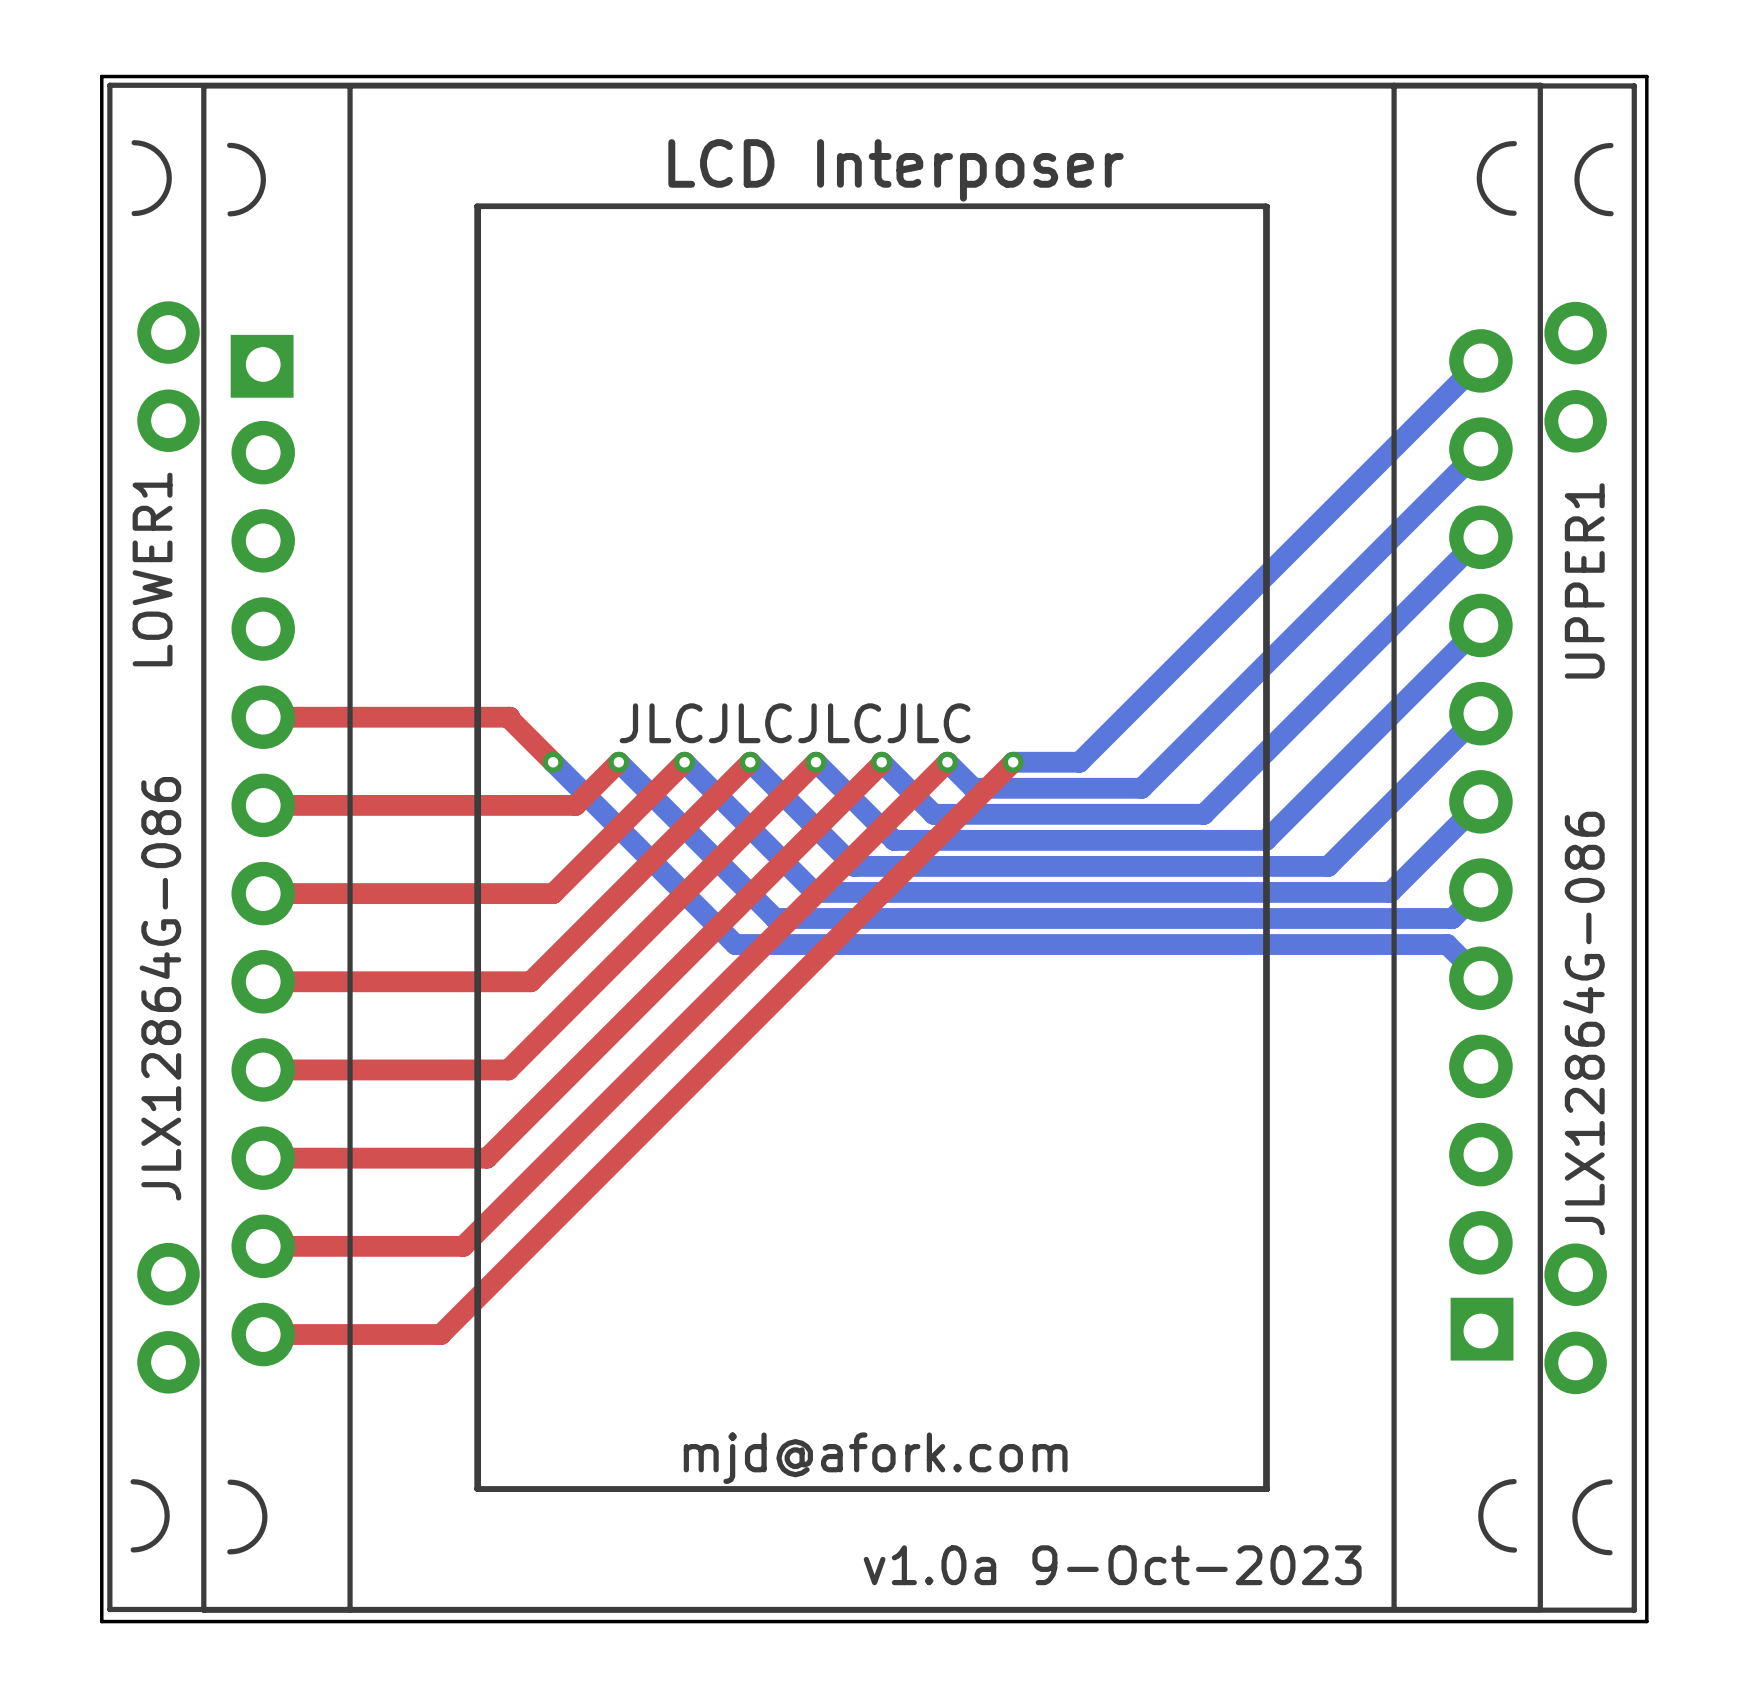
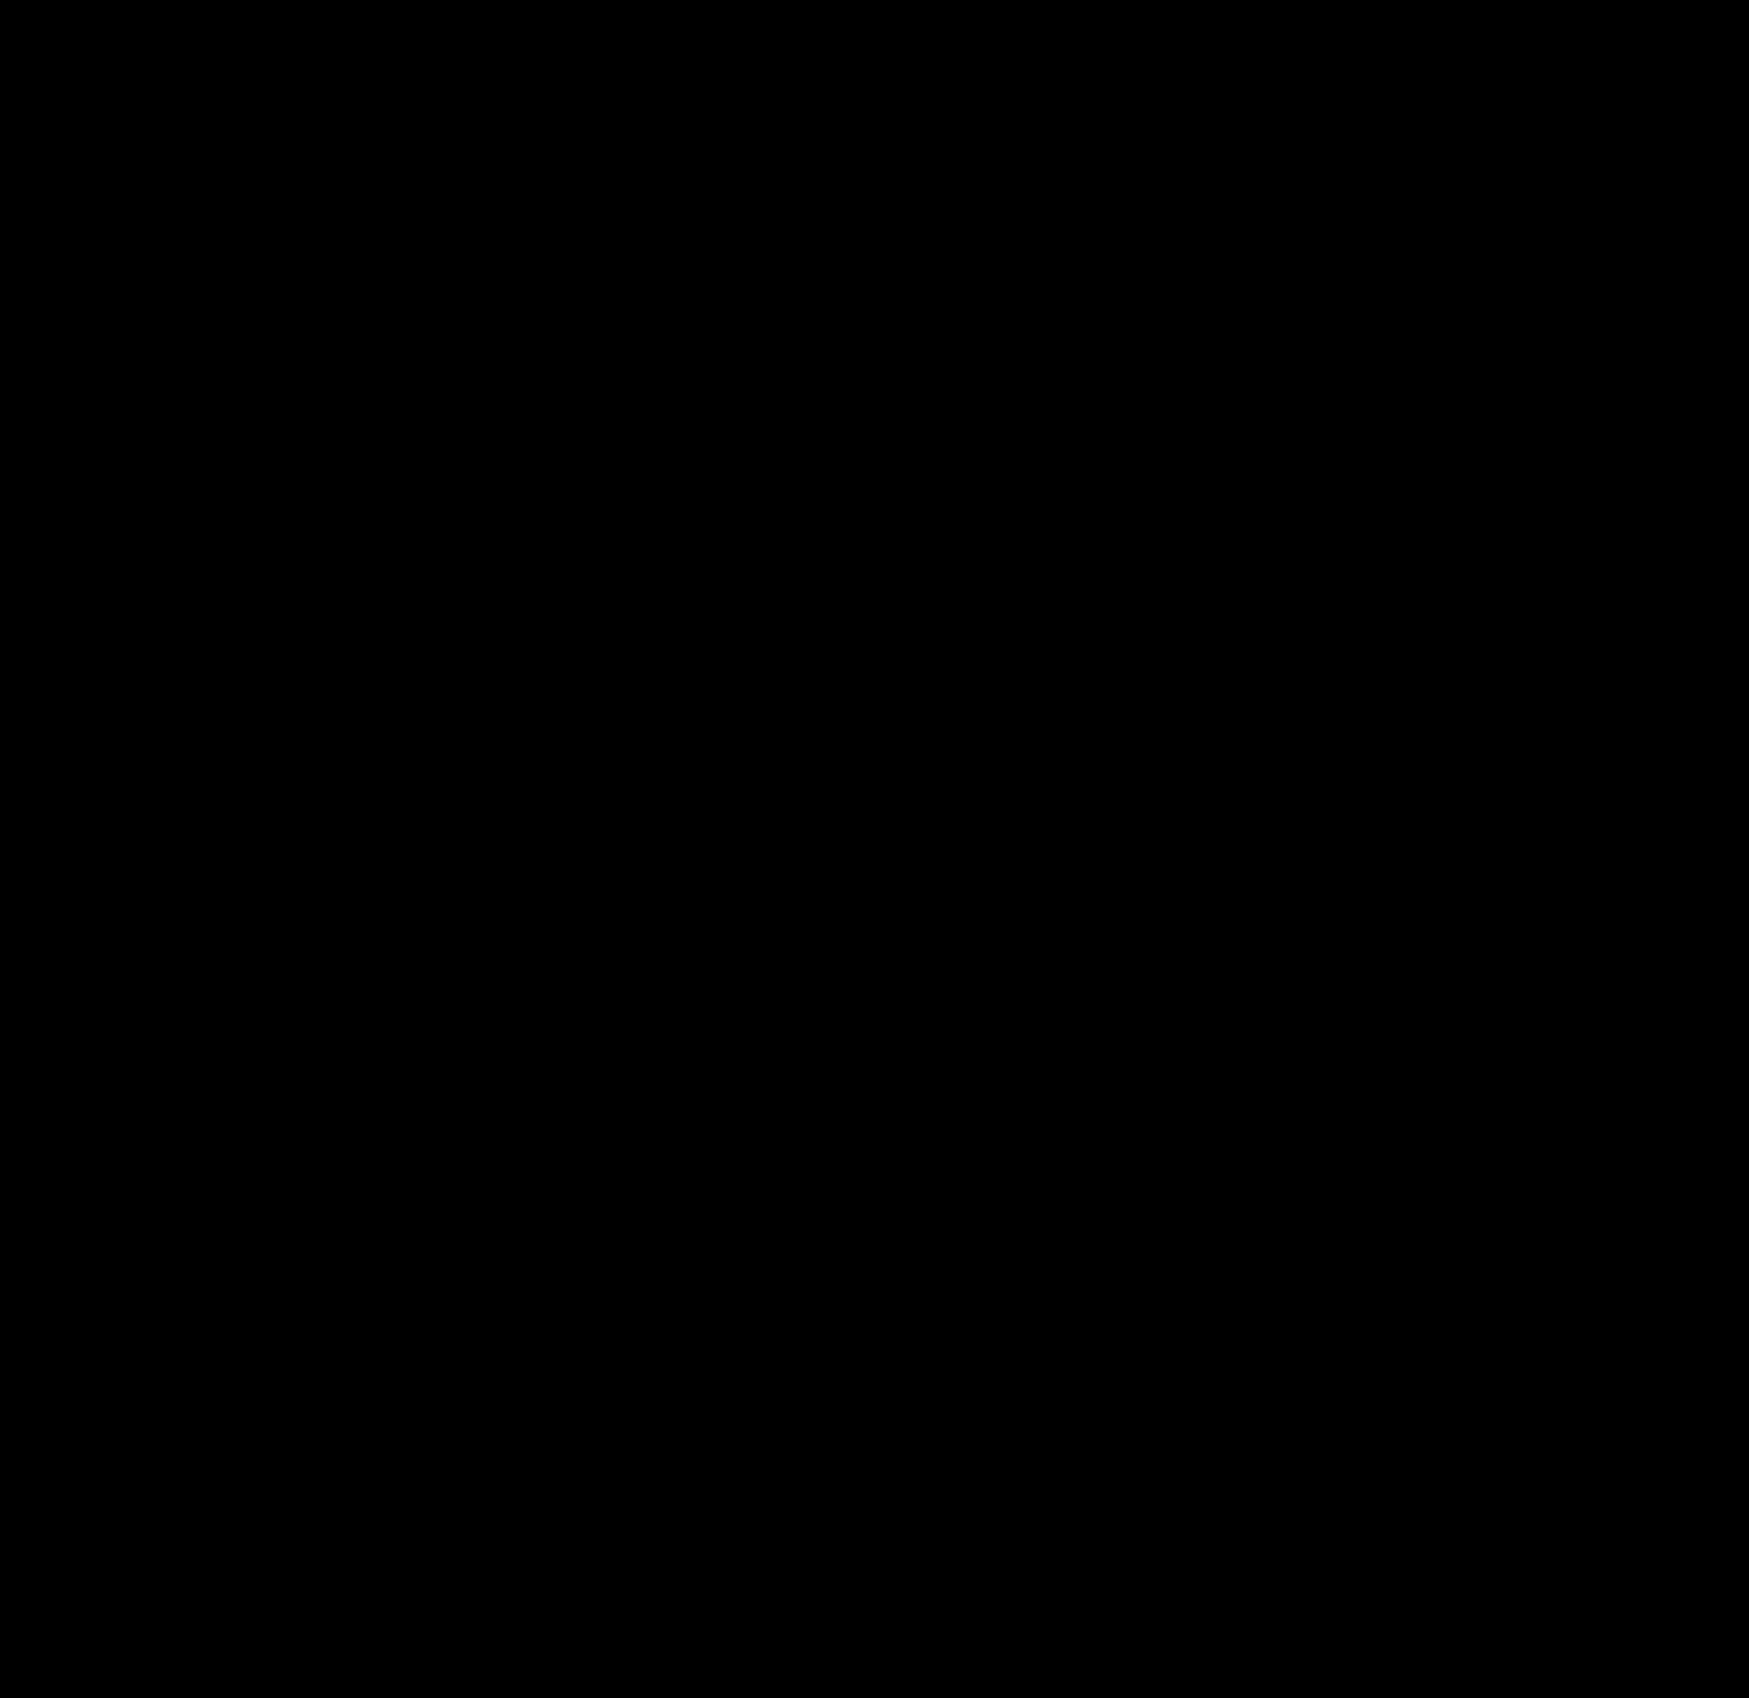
board edge: (101, 76) (1646, 76) (1646, 1621) (101, 1621) (101, 76) -> none
text: LCD Interposer (895, 170) -> none
bottom track: (1480, 360) (1079, 762) (1013, 762) -> none
bottom track: (1480, 449) (1141, 788) (973, 788) (947, 762) (947, 765) -> none
bottom track: (1480, 537) (1203, 814) (933, 814) (881, 762) -> none
bottom track: (1480, 625) (1266, 840) (894, 840) (816, 762) -> none
bottom track: (1480, 713) (1328, 866) (854, 866) (750, 762) -> none
top track: (263, 717) (509, 717) (553, 762) -> none
text: JLCJLCJLCJLC (795, 723) -> none
bottom track: (553, 762) (735, 944) (1447, 944) (1480, 978) -> none
via: (553, 762) -> none
top track: (618, 762) (575, 805) (263, 805) -> none
bottom track: (618, 762) (775, 918) (1452, 918) (1480, 890) -> none
via: (618, 762) -> none
top track: (684, 762) (553, 893) (263, 893) -> none
bottom track: (684, 762) (814, 892) (1390, 892) (1480, 801) -> none
via: (684, 762) -> none
top track: (750, 762) (530, 981) (263, 981) -> none
via: (750, 762) -> none
top track: (816, 762) (508, 1069) (263, 1069) -> none
via: (816, 762) -> none
top track: (881, 762) (487, 1158) (263, 1158) -> none
via: (881, 762) -> none
top track: (947, 762) (463, 1246) (263, 1246) -> none
via: (947, 762) -> none
top track: (1013, 762) (440, 1334) (263, 1334) -> none
via: (1013, 762) -> none
LOWER1: JLX12864G-086 (825, 847) -> none
UPPER1: JLX12864G-086 (919, 848) -> none
text: mjd@afork.com (875, 1458) -> none
text: v1.0a 9-Oct-2023 (1112, 1565) -> none

